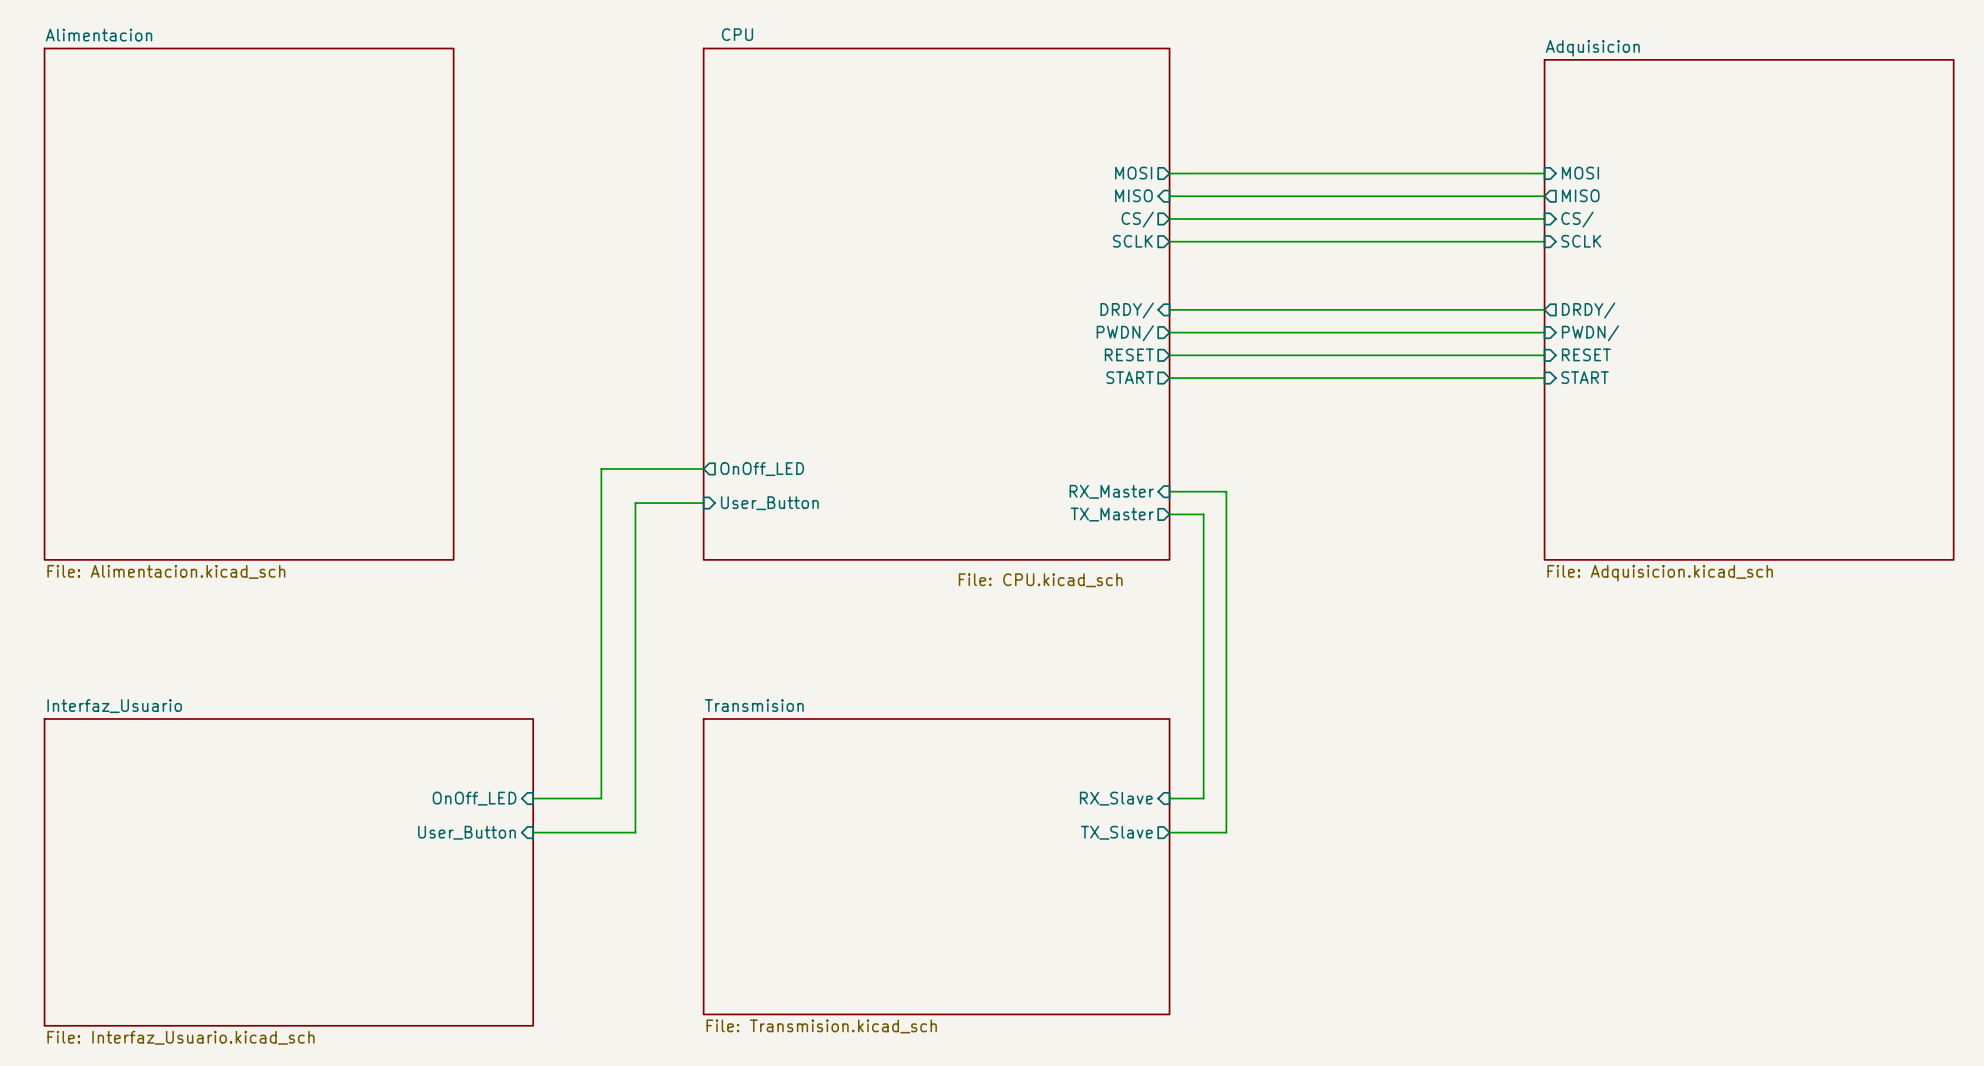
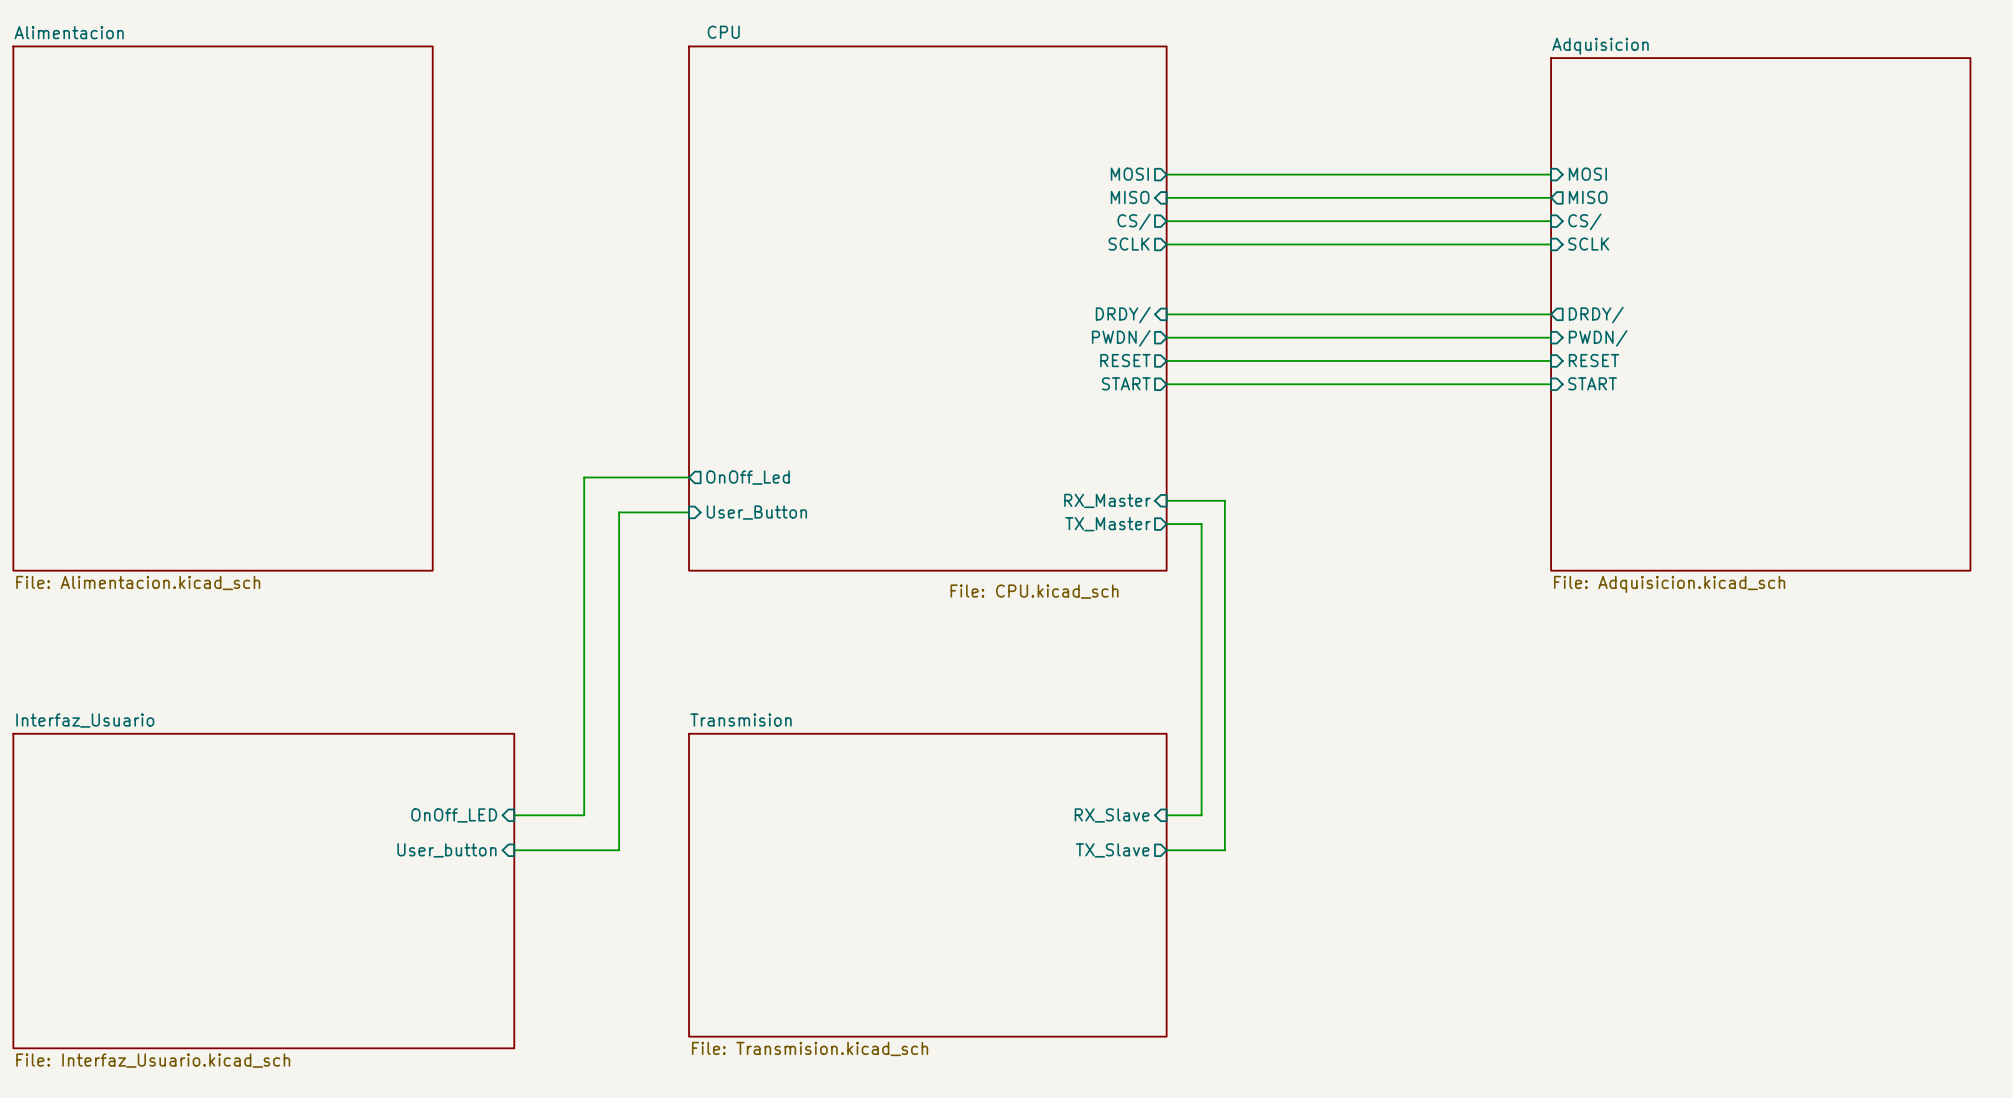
sheet pin: OnOff_LED (762, 469) -> OnOff_Led (748, 477)
sheet pin: User_Button (466, 832) -> User_button (446, 850)

